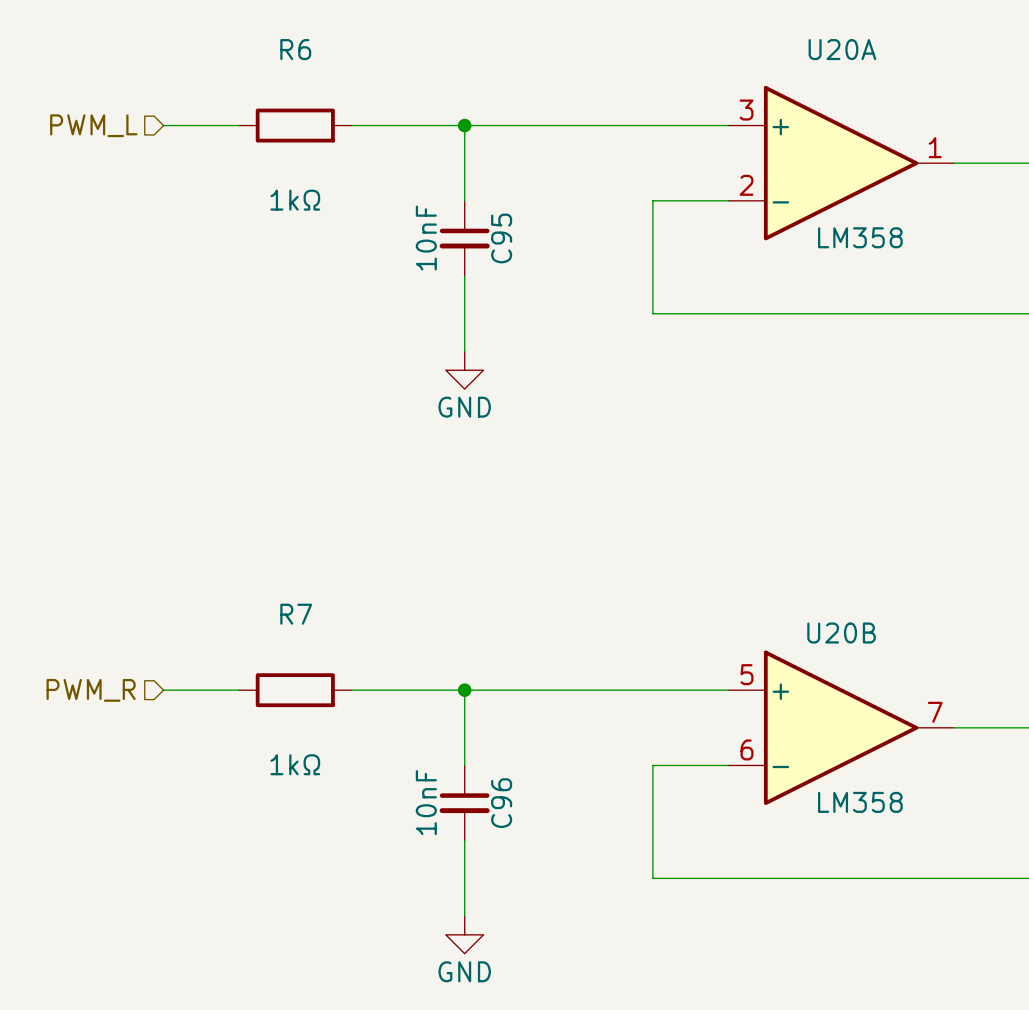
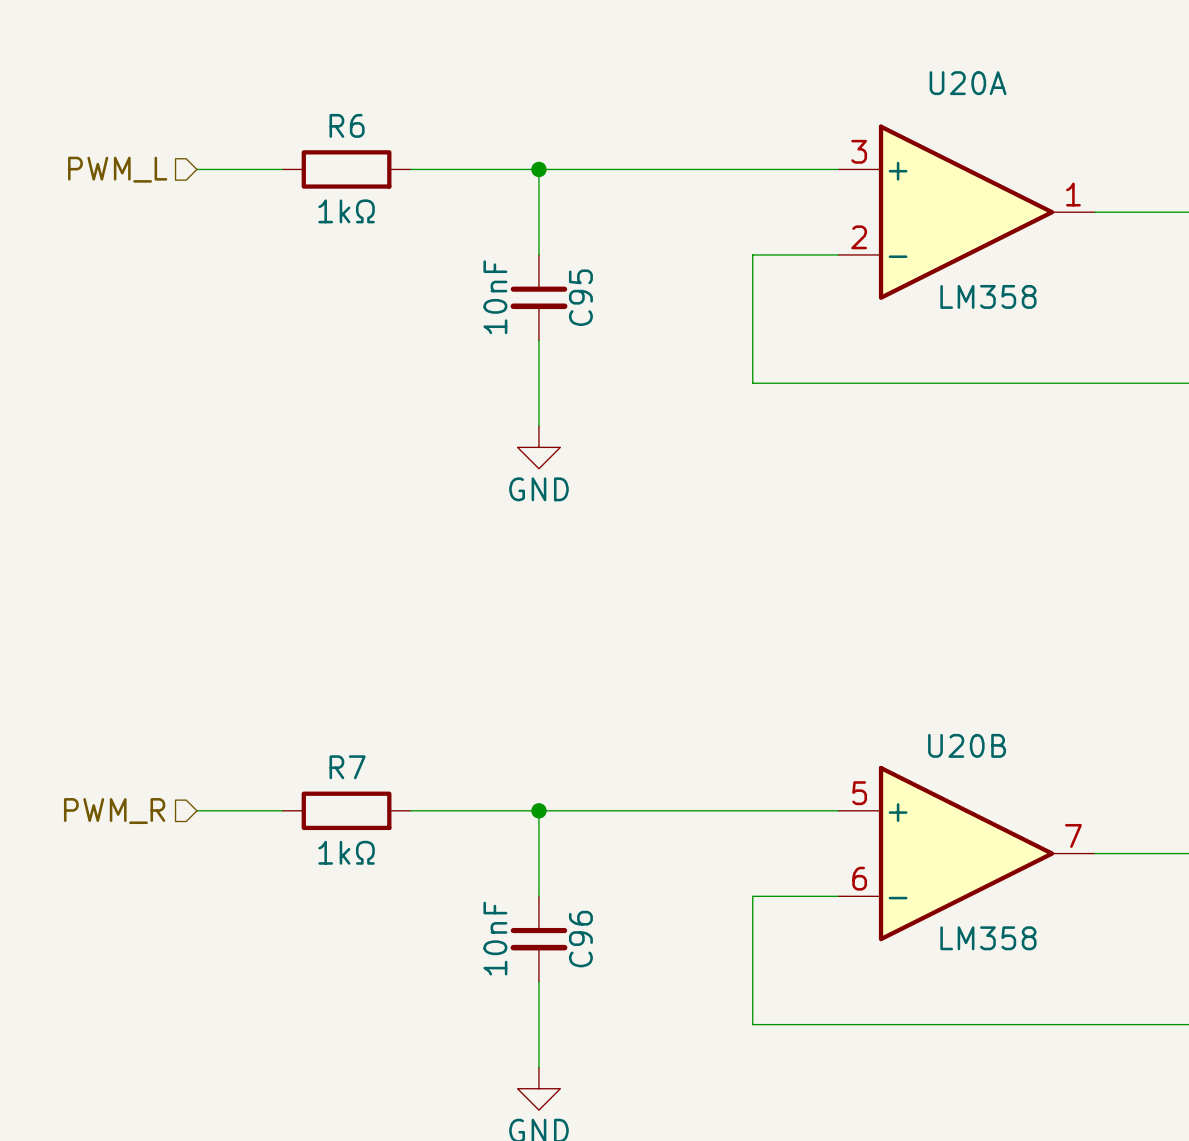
R6 name position: R6 (295, 49) -> R6 (347, 125)
R6 value position: 1kΩ (295, 200) -> 1kΩ (346, 211)
R7 name position: R7 (296, 614) -> R7 (347, 767)
R7 value position: 1kΩ (295, 764) -> 1kΩ (346, 852)

